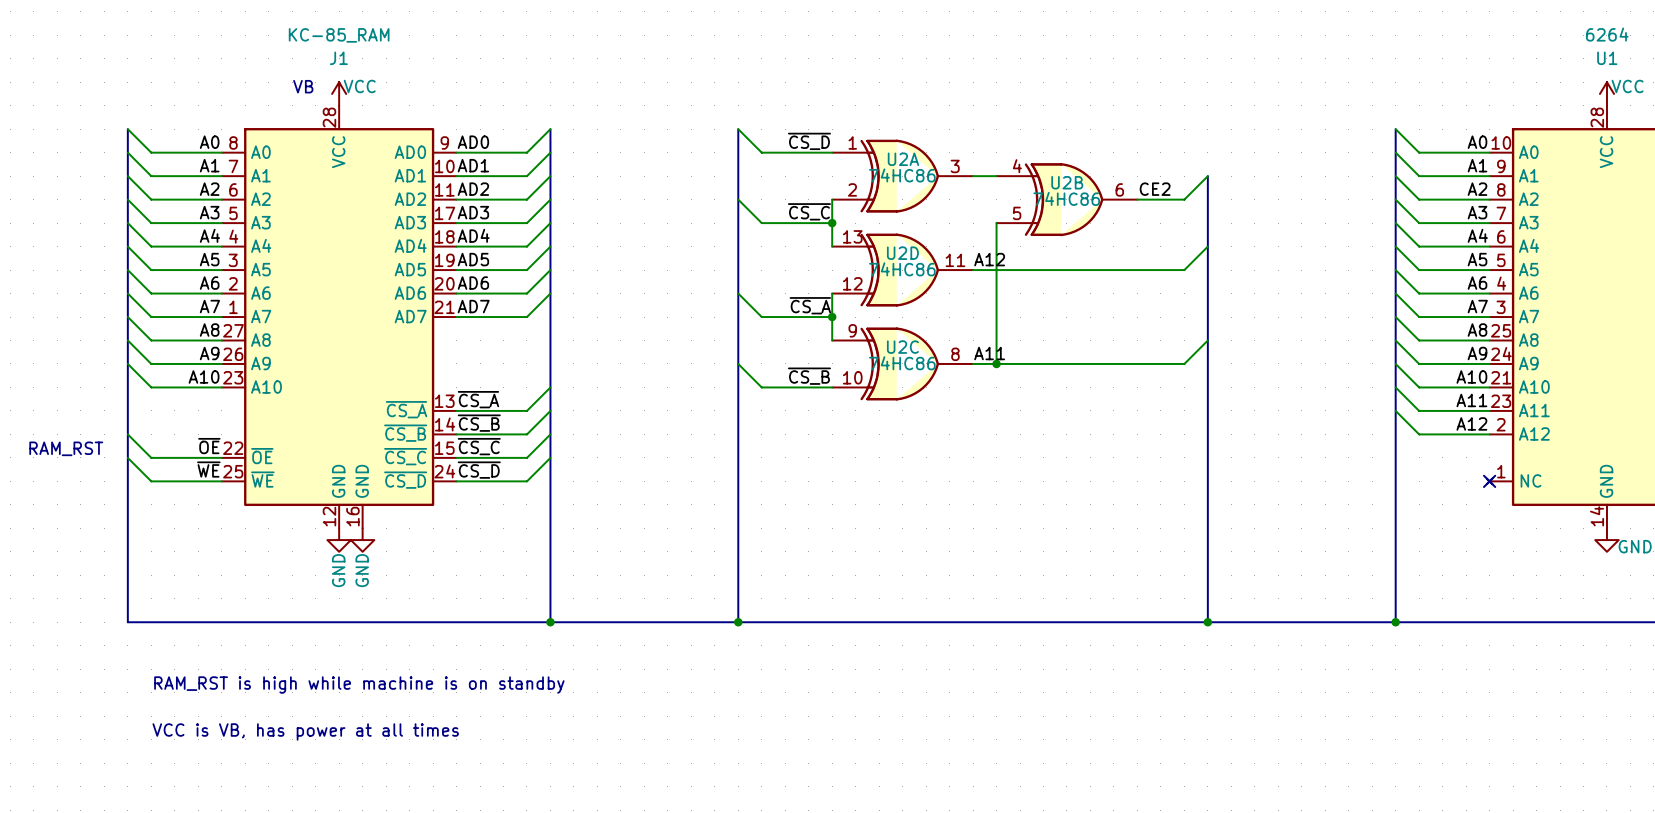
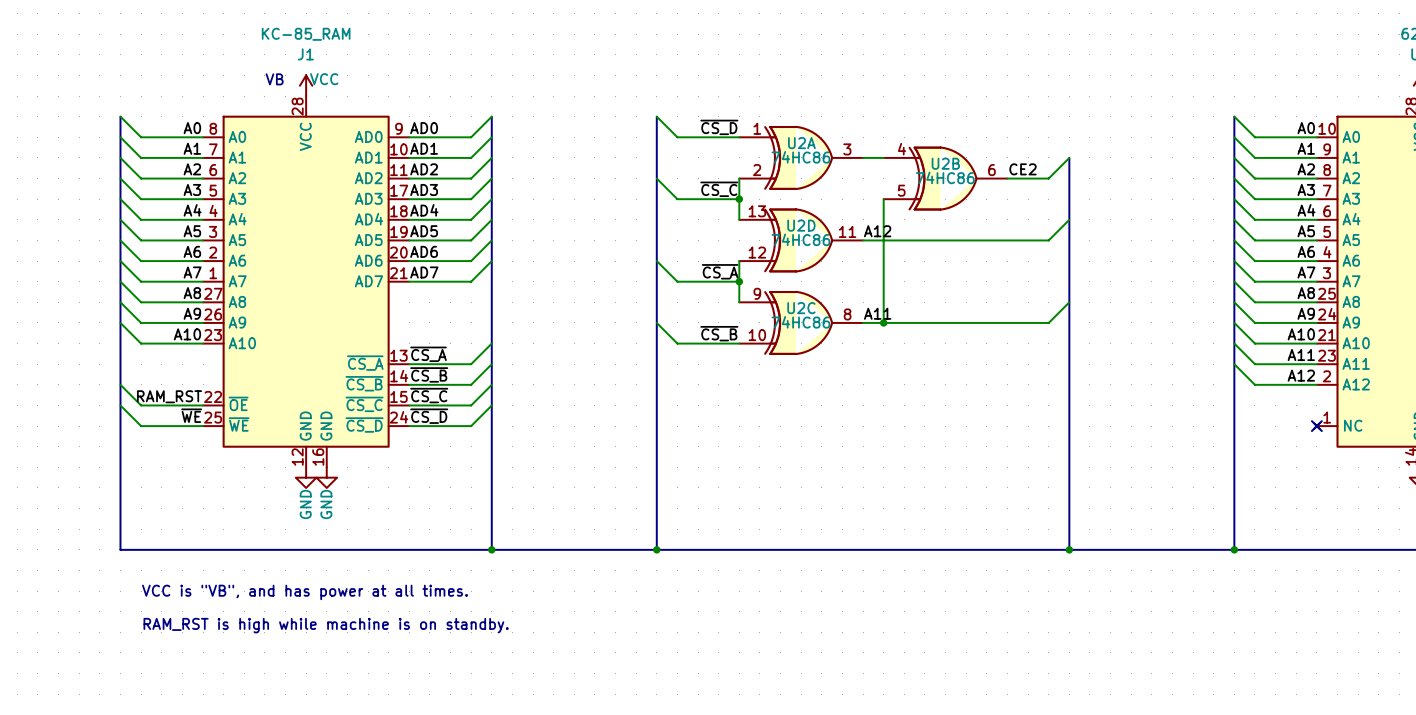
label: ~{OE} (209, 446) -> RAM_RST (169, 396)
text: RAM_RST (66, 448) -> none
text: none -> VCC is "VB", and has power at all times. (304, 592)
text: RAM_RST is high while machine is on standby (359, 685) -> RAM_RST is high while machine is on standby. (326, 625)
text: VCC is VB, has power at all times (305, 731) -> none

